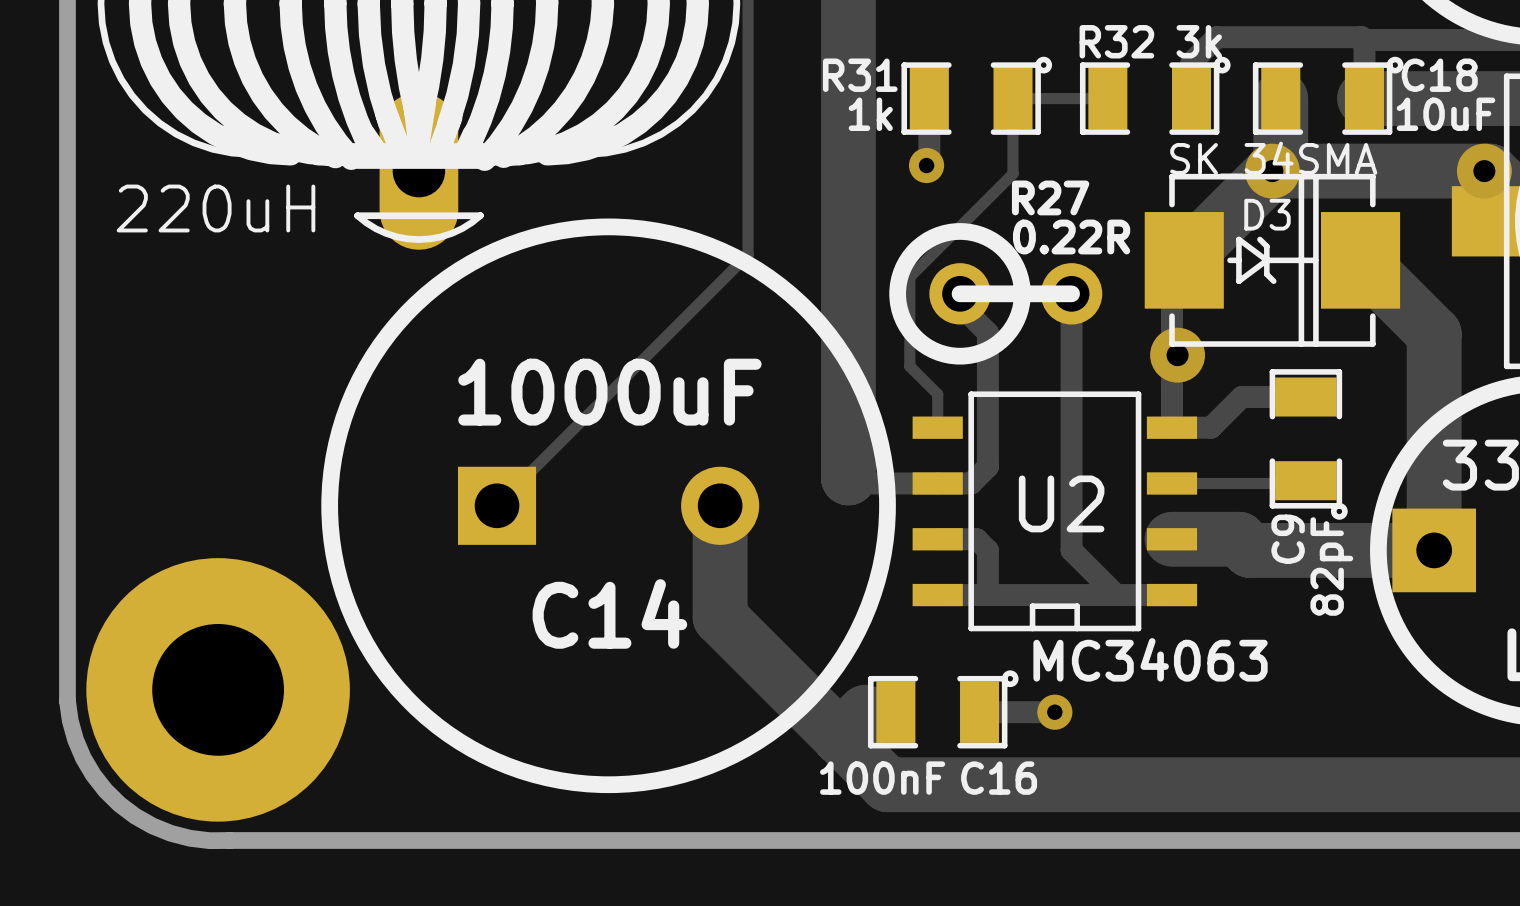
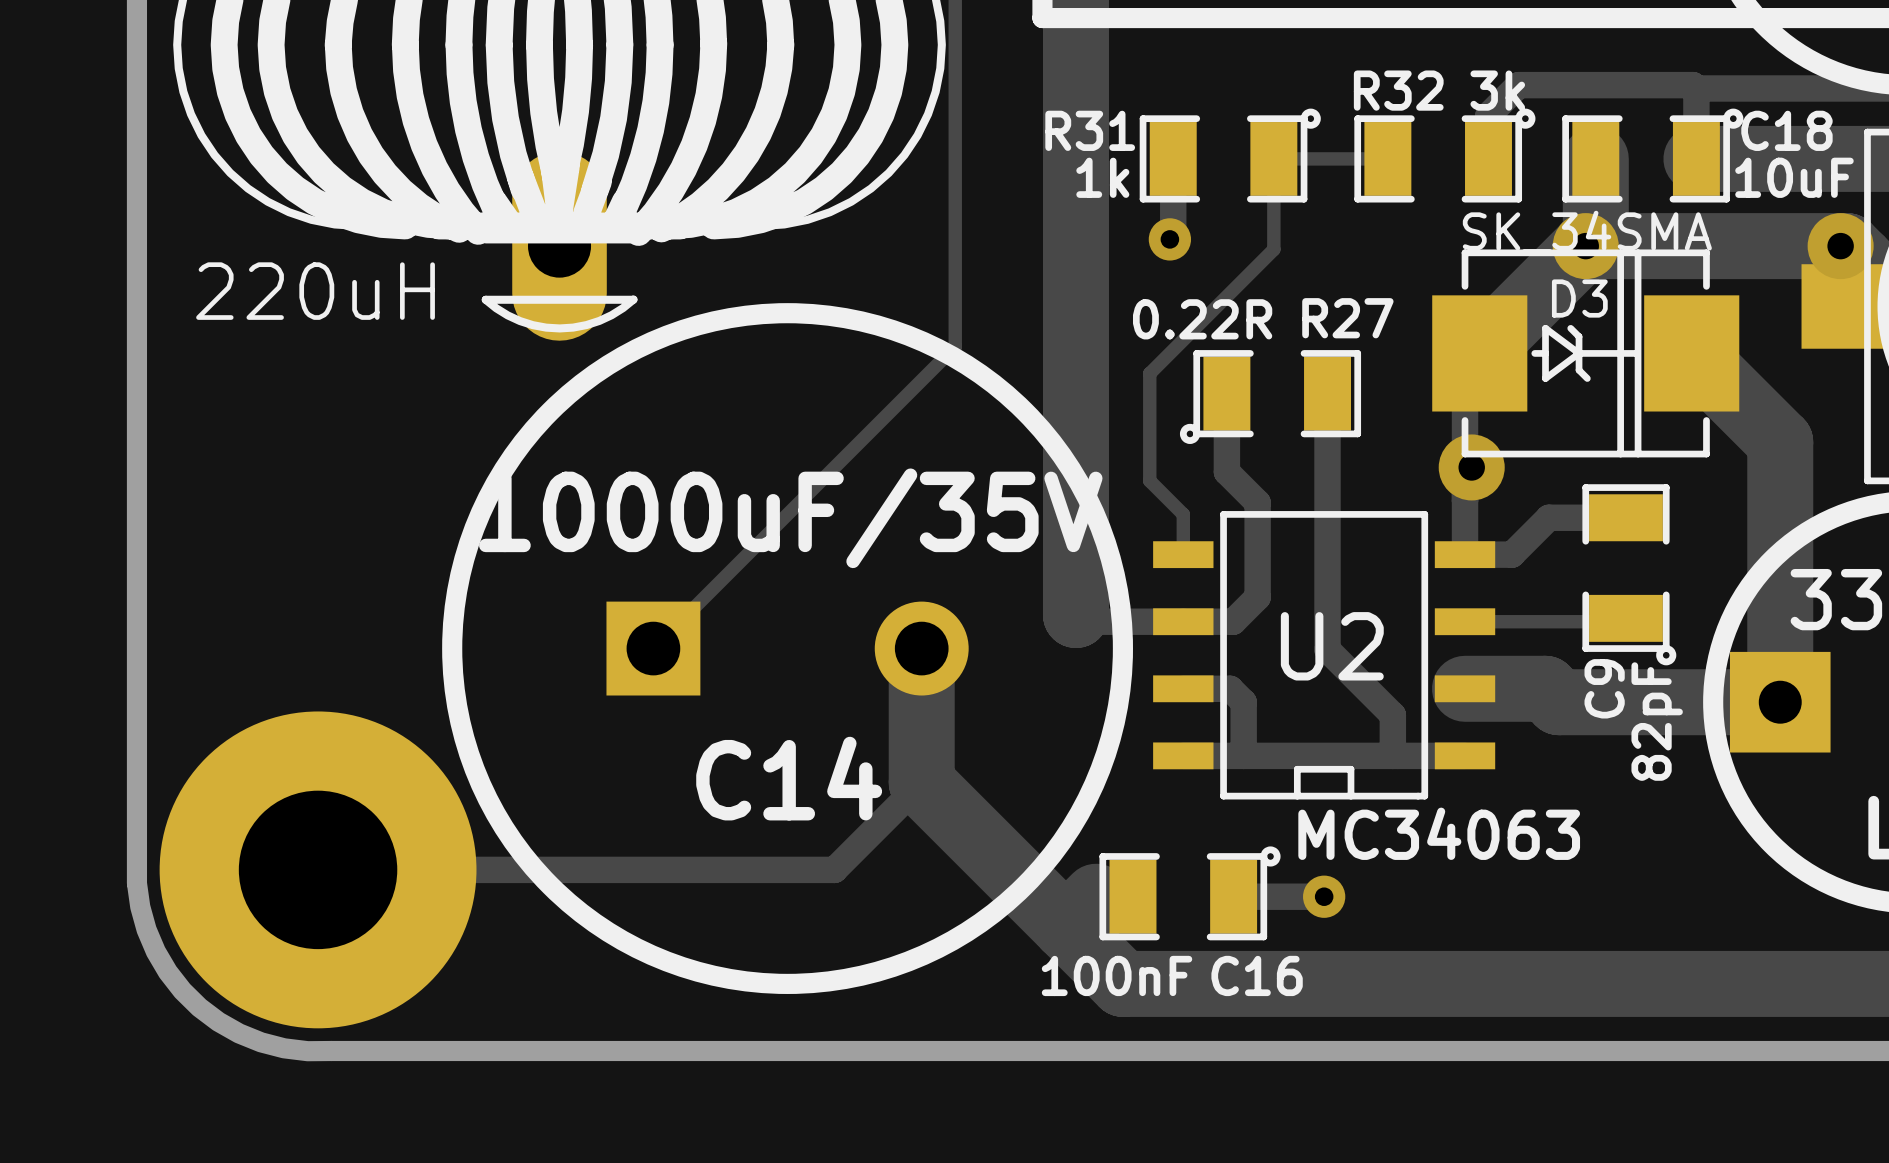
R27 footprint: [889, 223, 1103, 365] -> [1179, 350, 1362, 444]
R27 value position: 0.22R (1071, 236) -> 0.22R (1202, 319)
track: (960, 293) (960, 304) (987, 332) (987, 466) (971, 483) -> (1226, 393) (1226, 472) (1257, 502) (1257, 597) (1233, 621) (1223, 621)
track: none -> (1327, 393) (1327, 649) (1392, 715) (1392, 755)
track: (1071, 293) (1071, 550) (1116, 595) -> none
C14 value: 1000uF (609, 392) -> 1000uF/35V (790, 518)
track: none -> (921, 782) (834, 869) (318, 869)

